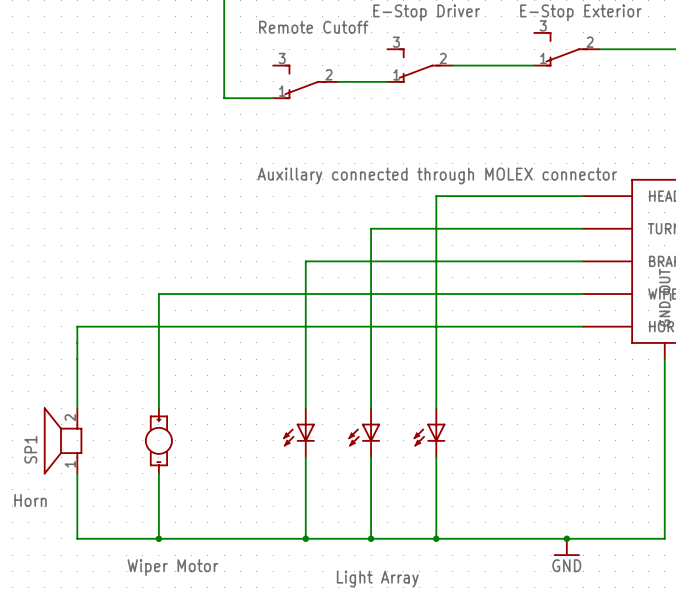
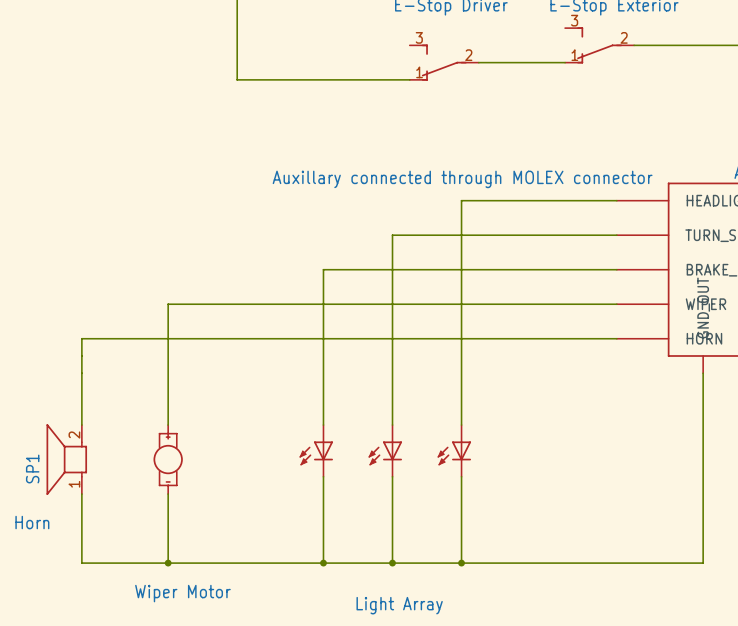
text: Remote Cutoff (313, 27) -> none
wire: (224, 81) (224, 98) (273, 98) -> (237, 79) (357, 79)
part: (305, 81) -> none
junction: (566, 538) -> none
power symbol: GND (566, 547) -> none

